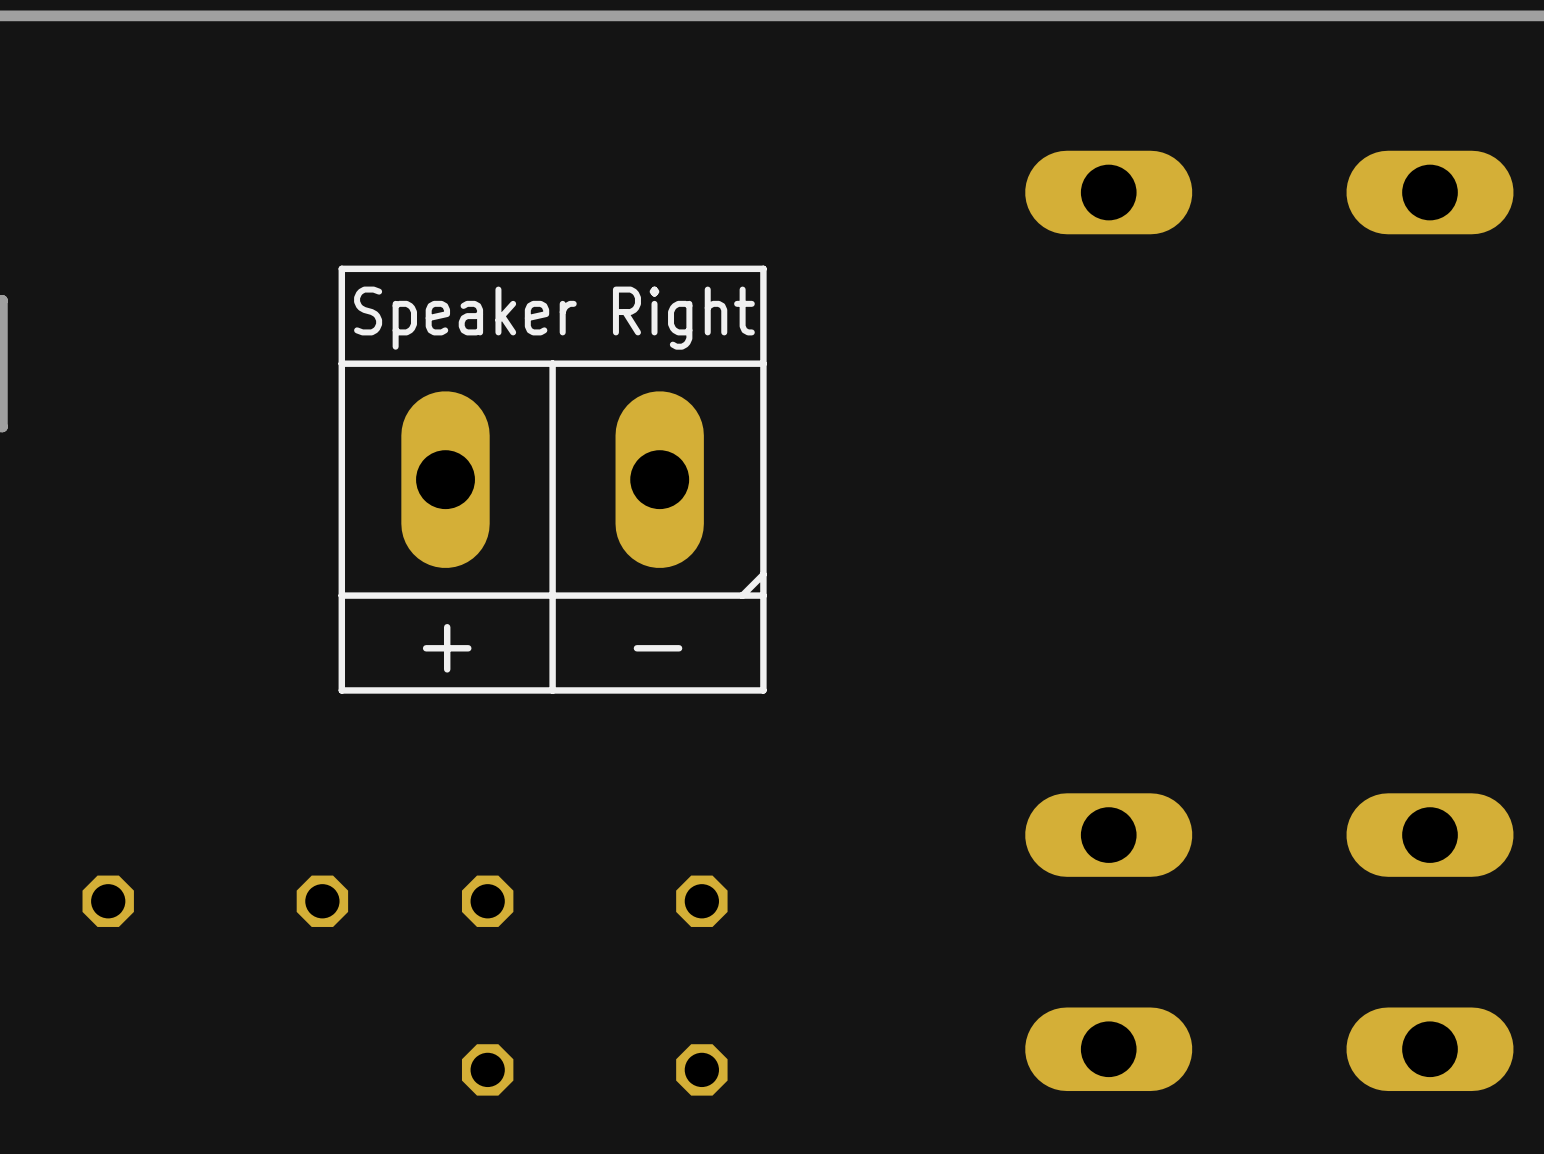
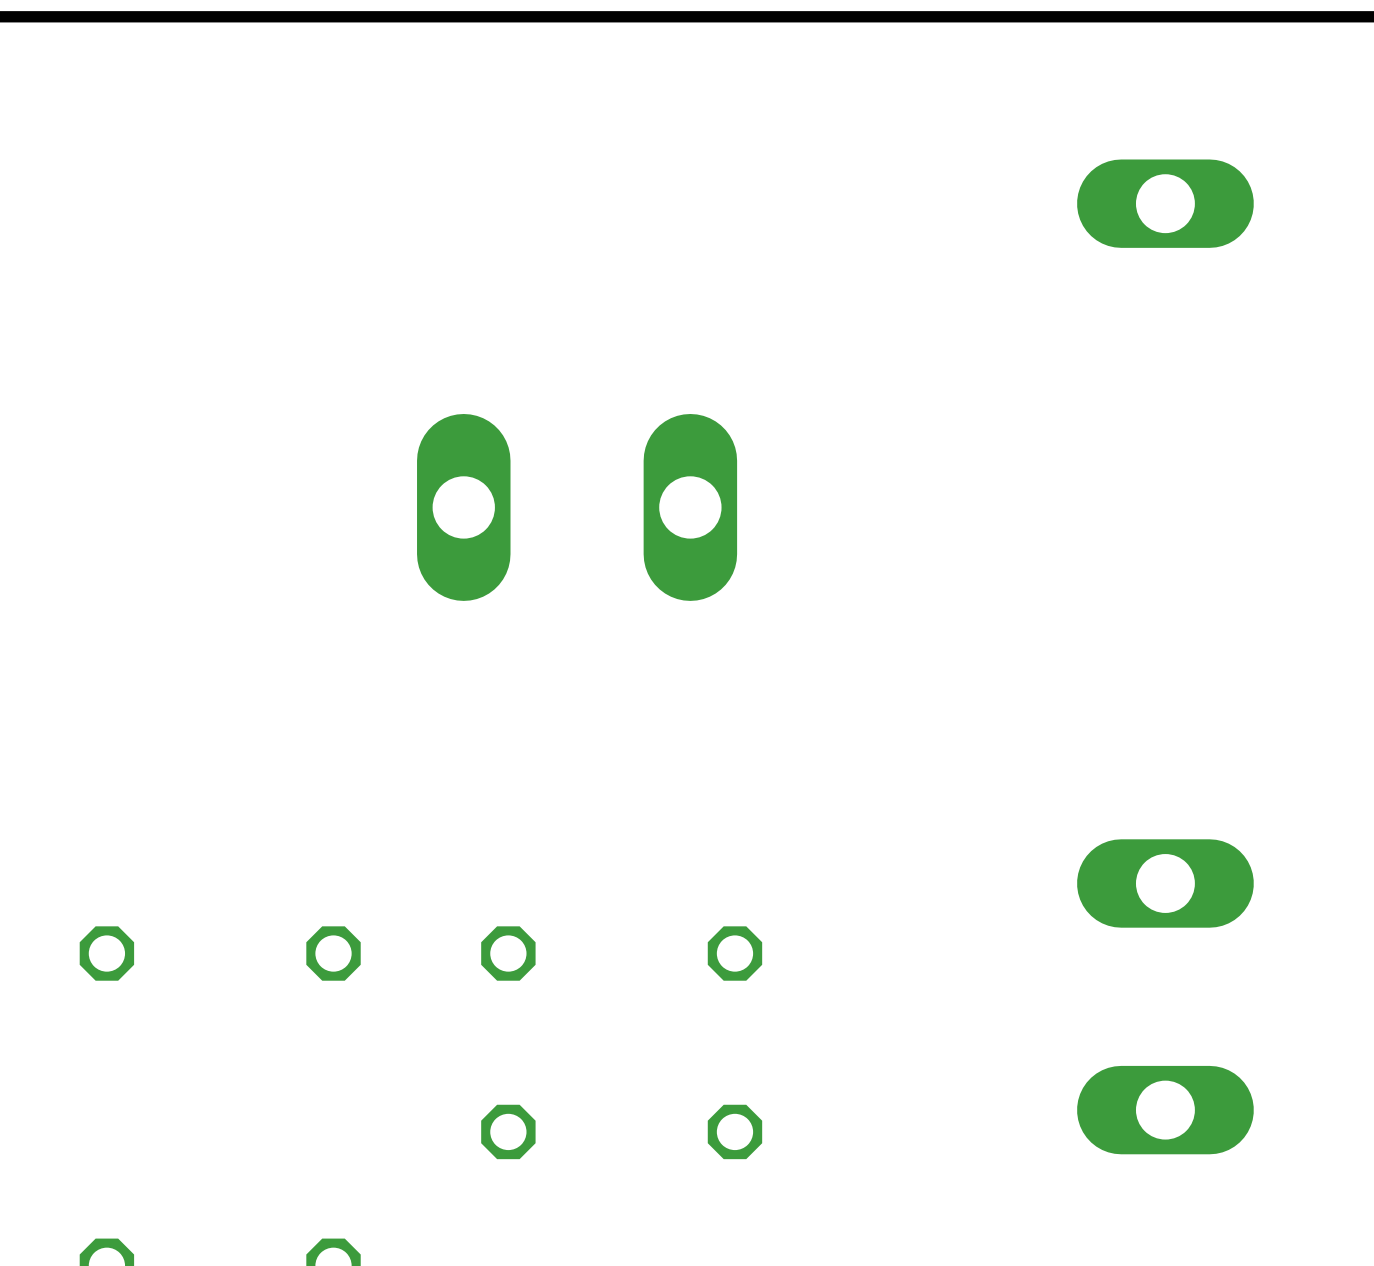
line: (763, 268) (763, 690) (341, 690) (341, 268) (763, 268) -> none
text: Speaker Right (554, 318) -> none
line: (552, 363) (552, 690) -> none
line: (763, 363) (341, 363) -> none
line: (763, 574) (742, 595) -> none
line: (763, 595) (341, 595) -> none
line: (447, 627) (447, 669) -> none
line: (468, 648) (426, 648) -> none
line: (679, 648) (636, 648) -> none

